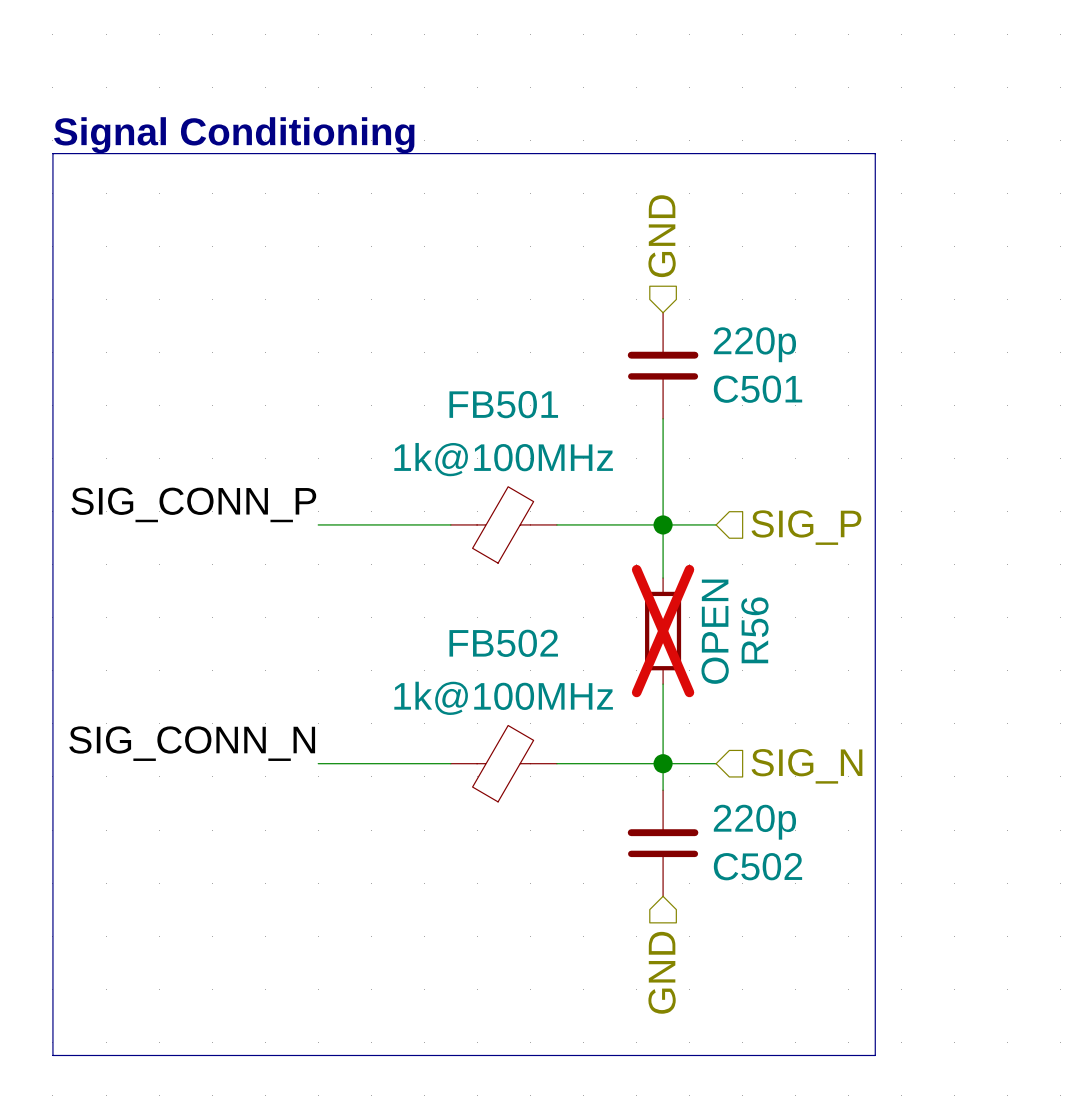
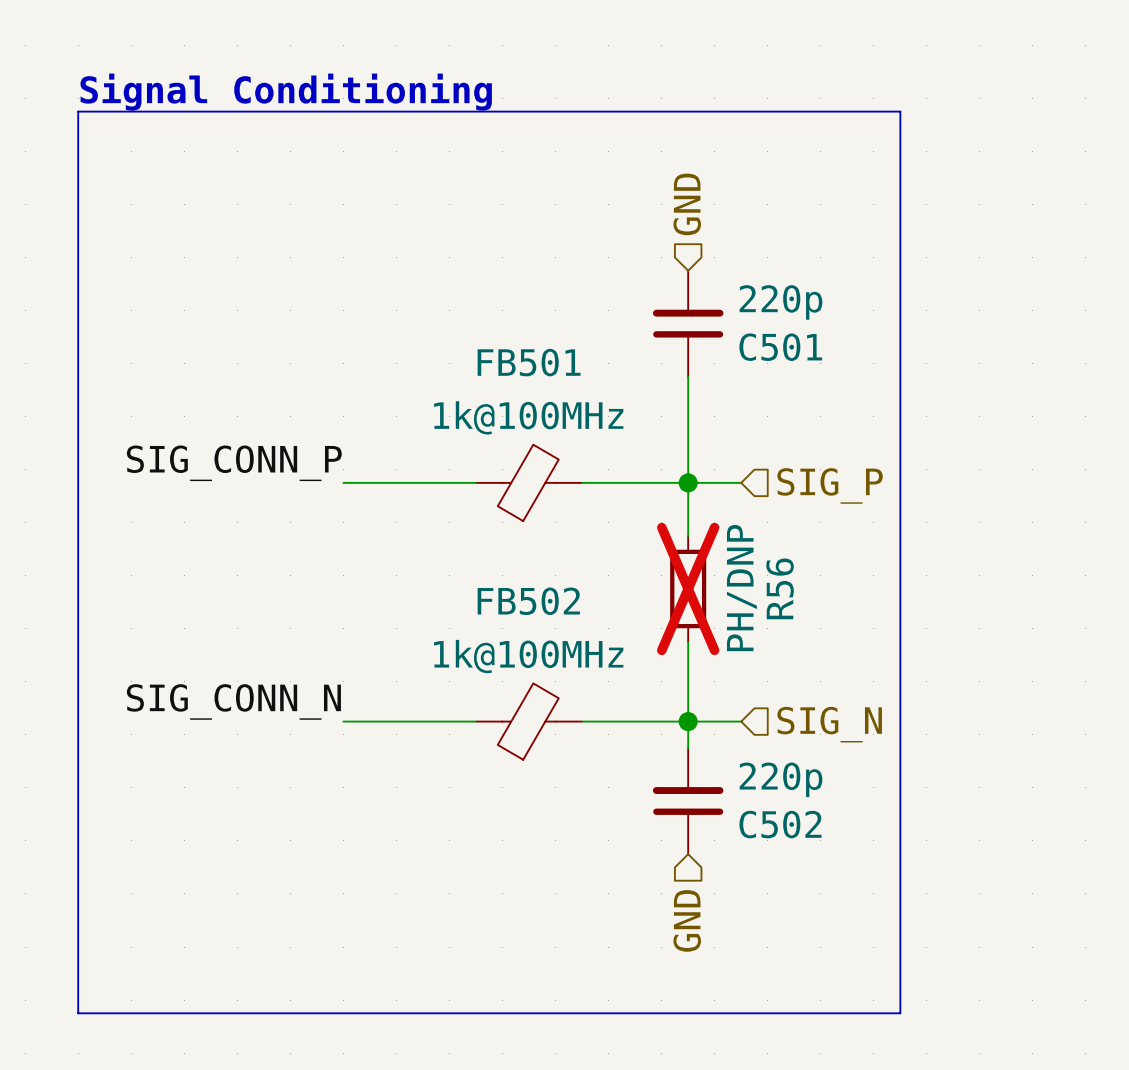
R56 value: OPEN (715, 631) -> PH/DNP (741, 588)

